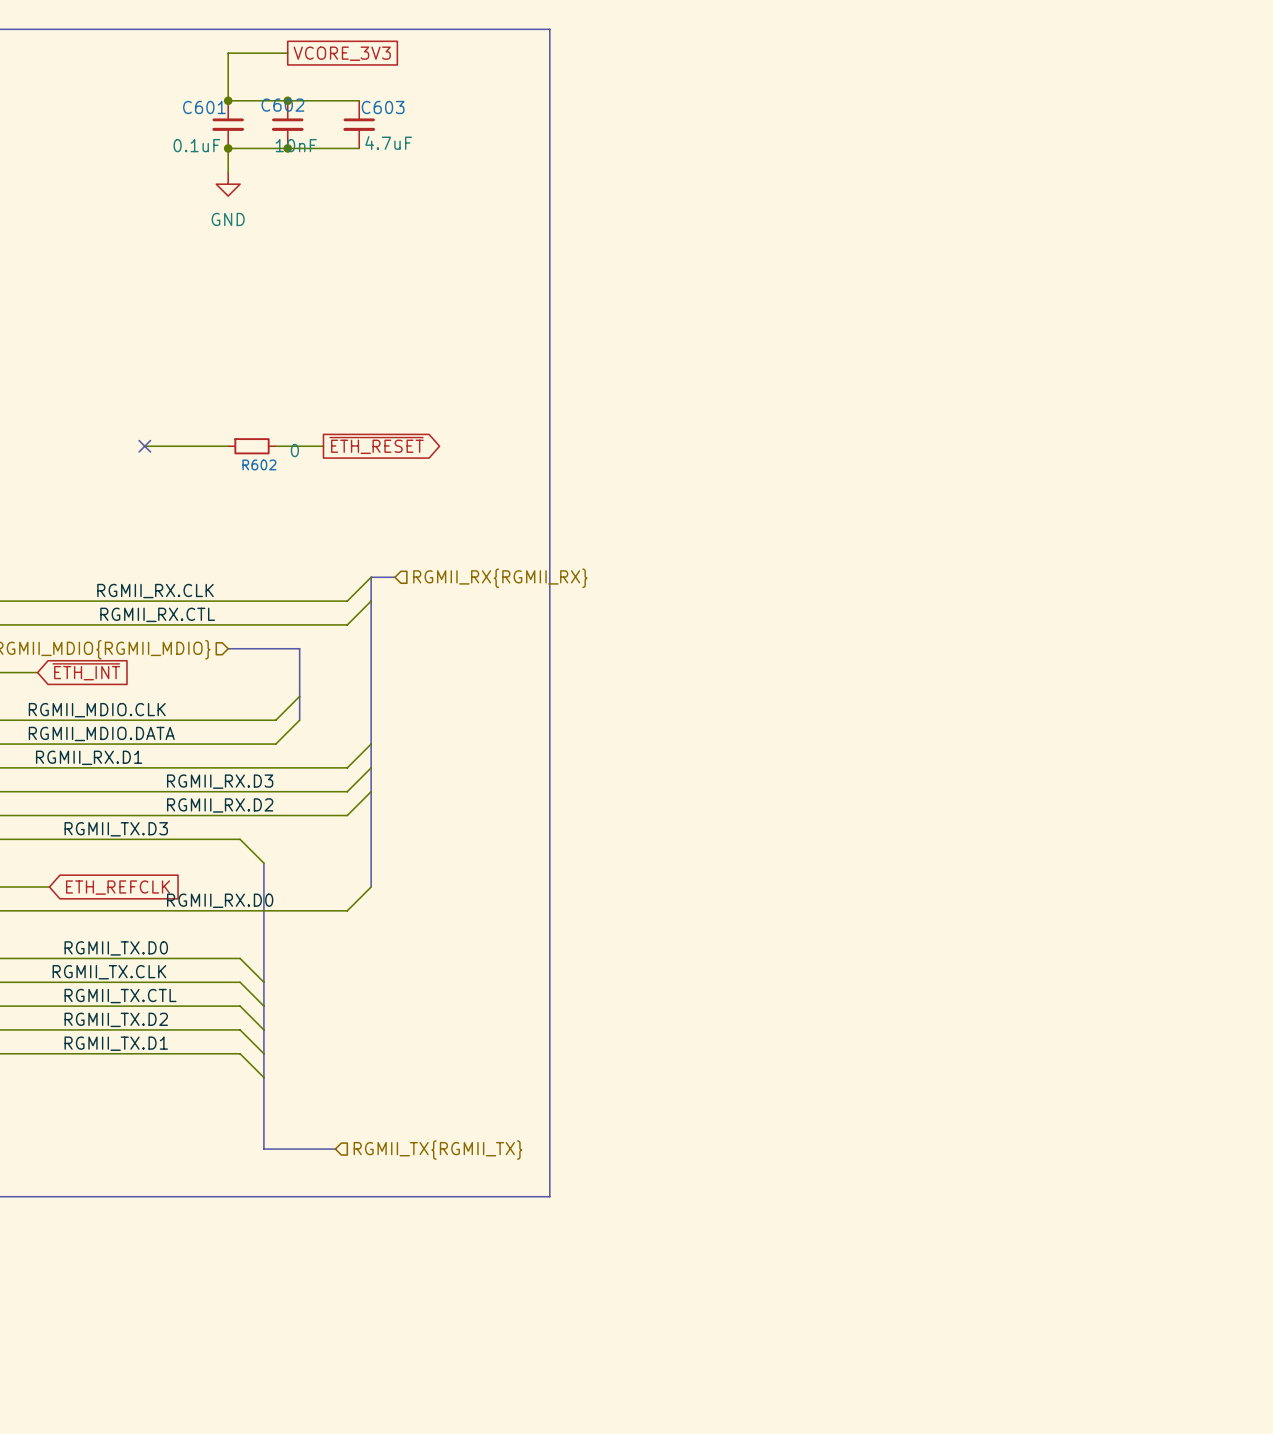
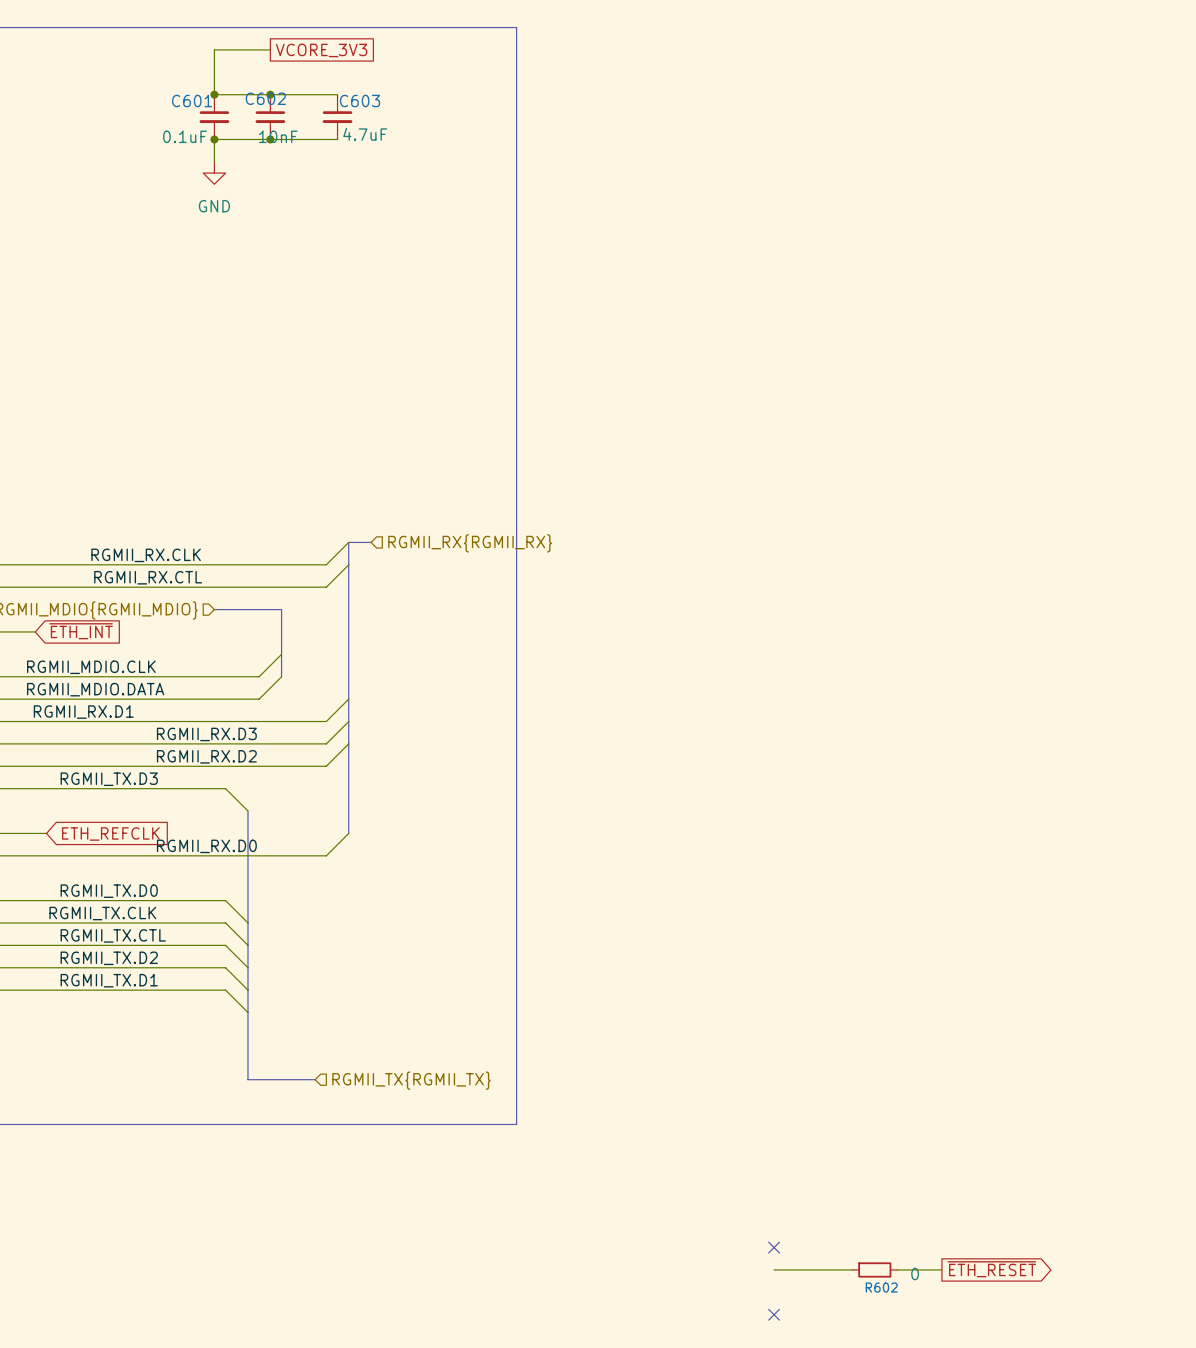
global label: ~{ETH_RESET} (376, 445) -> none
wire: (144, 446) (228, 446) -> none
no-connect mark: (144, 446) -> none
R602 position: (252, 446) -> (874, 1269)
wire: (275, 446) (323, 446) -> none
no-connect mark: none -> (774, 1247)
global label: none -> ~{ETH_RESET} (991, 1269)
wire: none -> (774, 1269) (852, 1269)
wire: none -> (897, 1269) (941, 1269)
no-connect mark: none -> (774, 1314)

